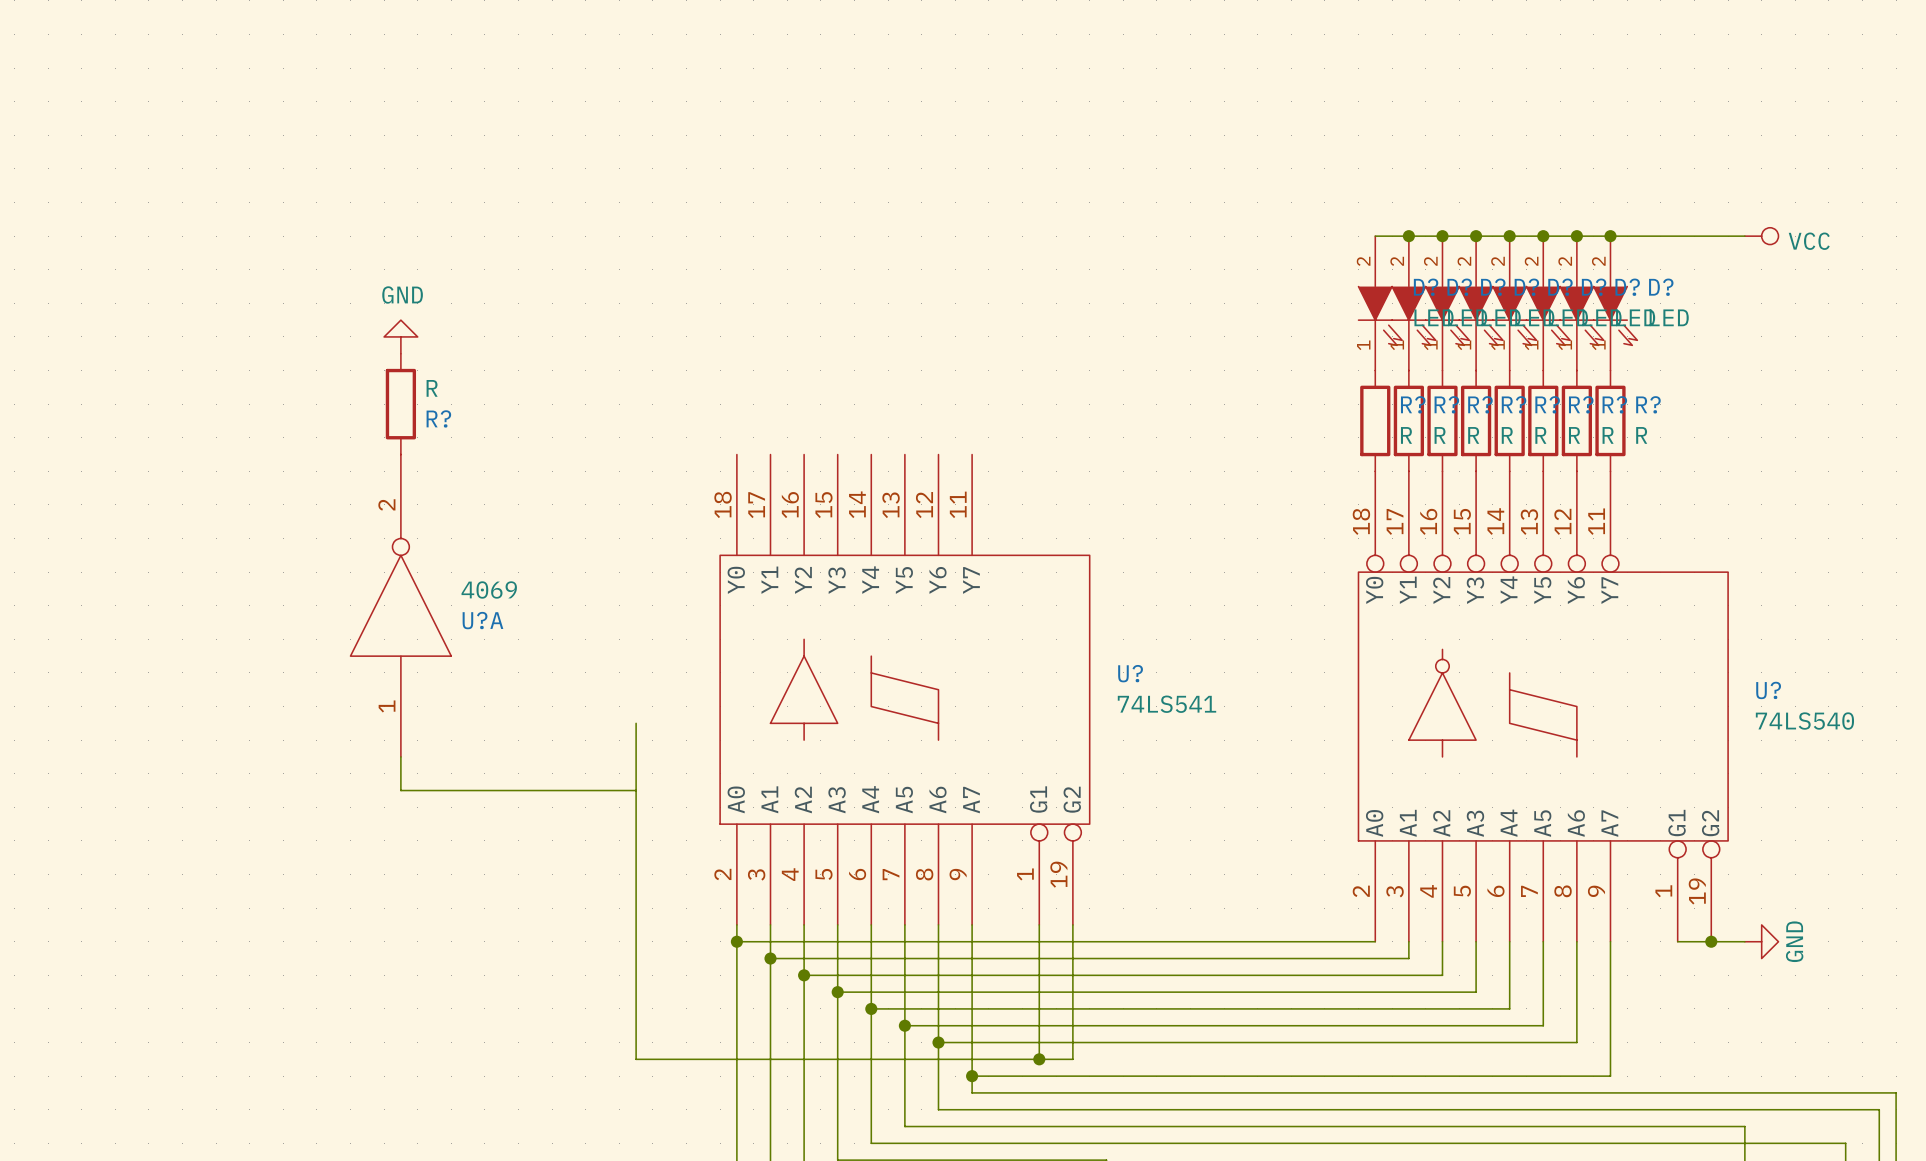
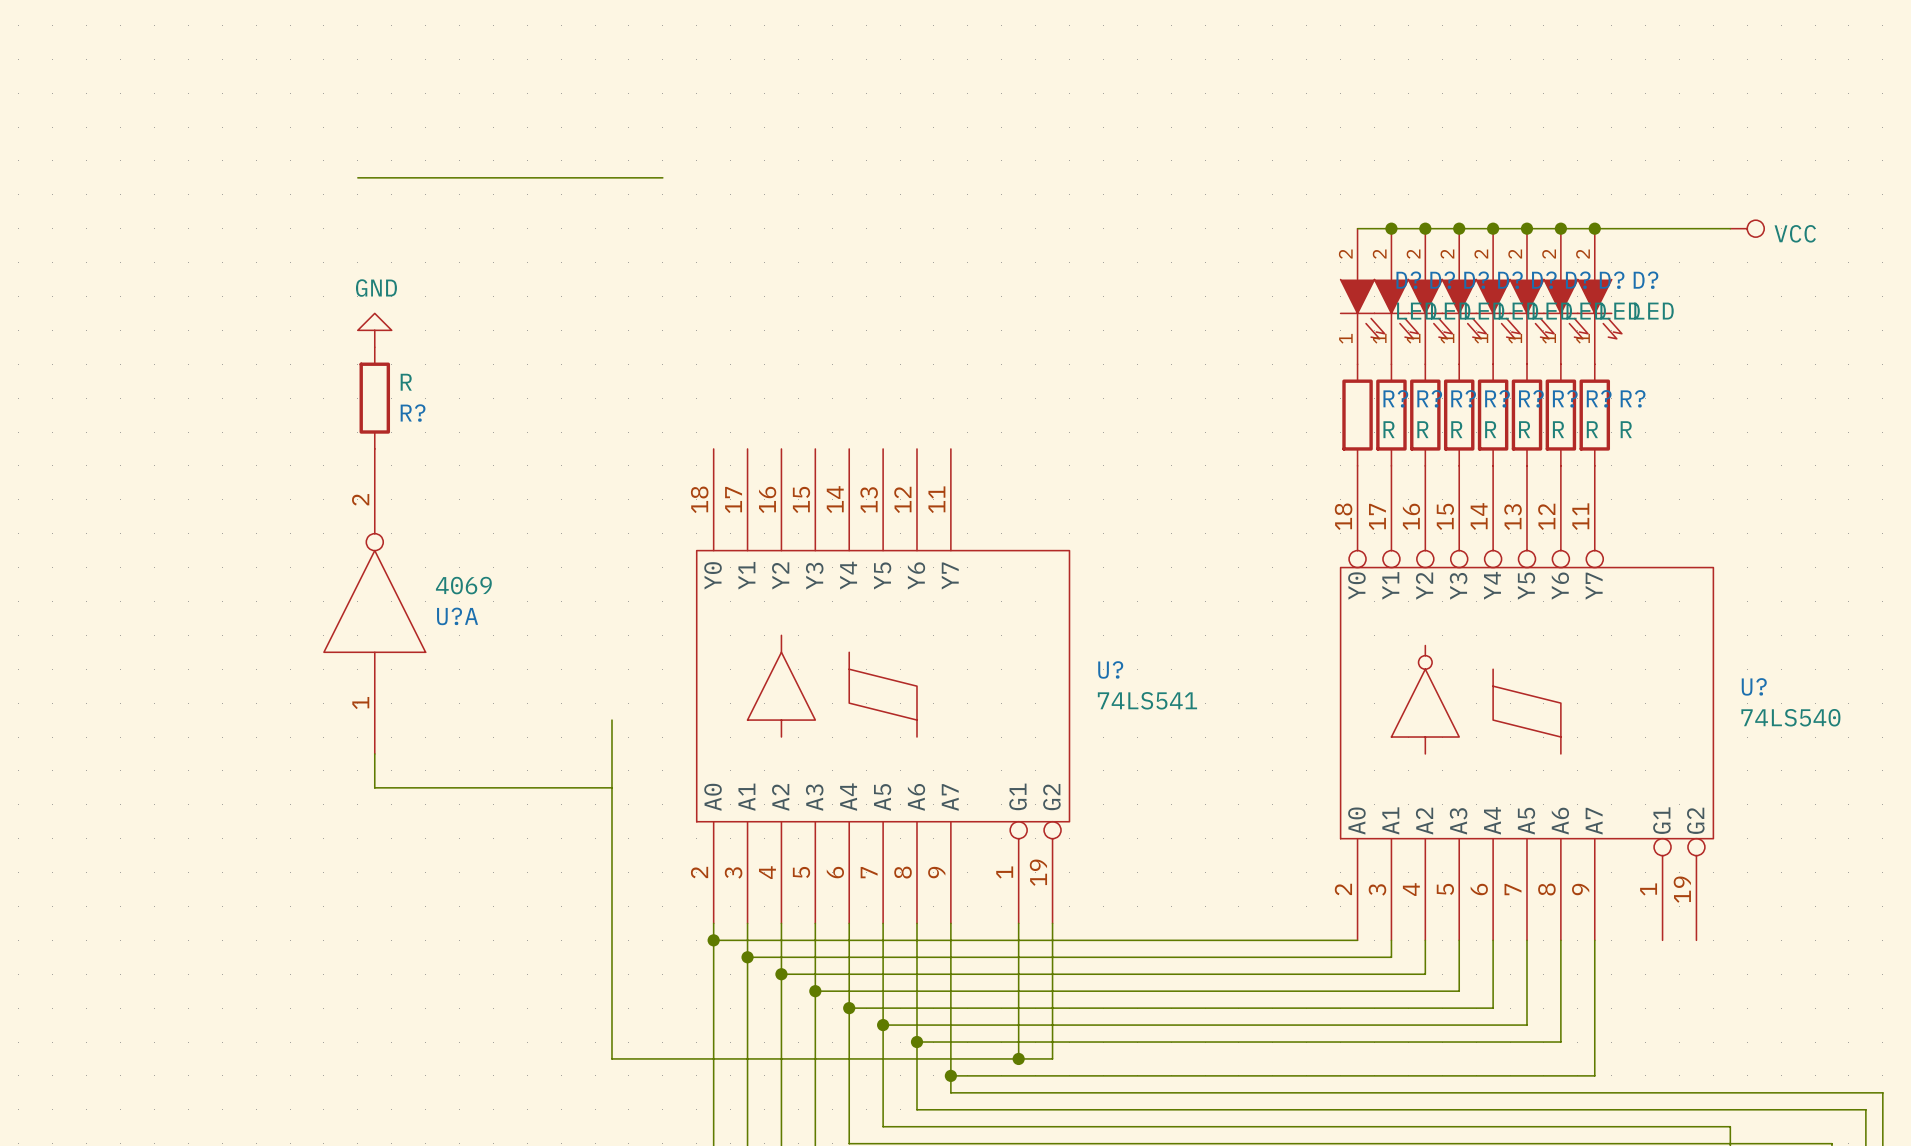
wire: none -> (357, 177) (662, 177)
wire: (1677, 941) (1744, 941) -> none
junction: (1711, 941) -> none
power symbol: GND (1761, 941) -> none

